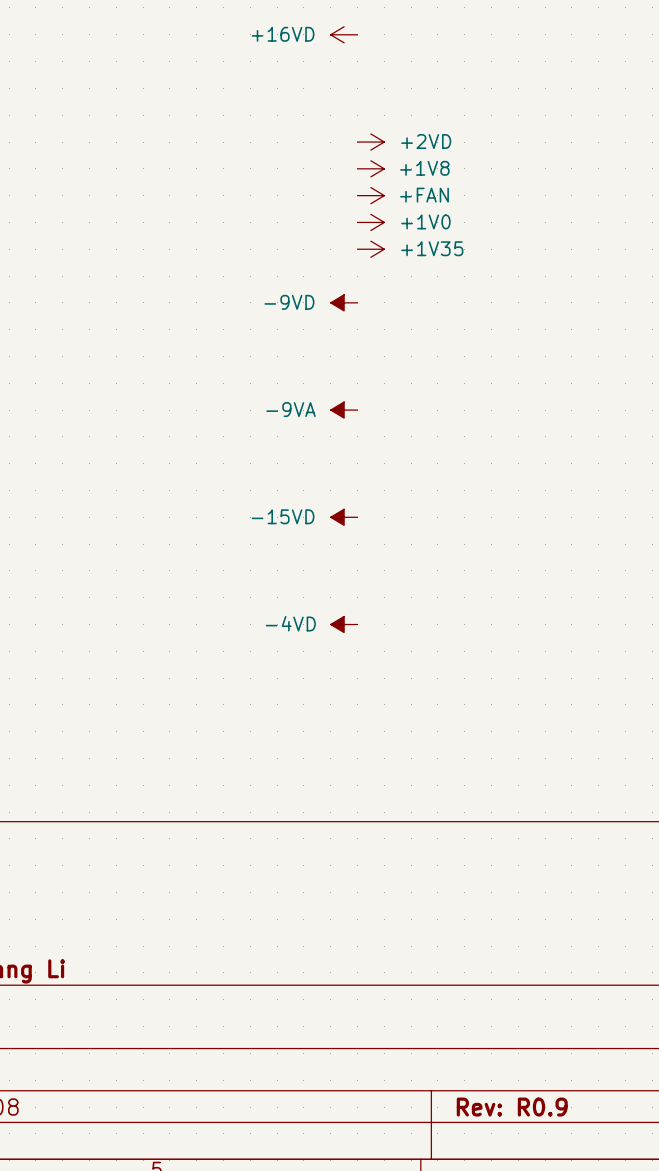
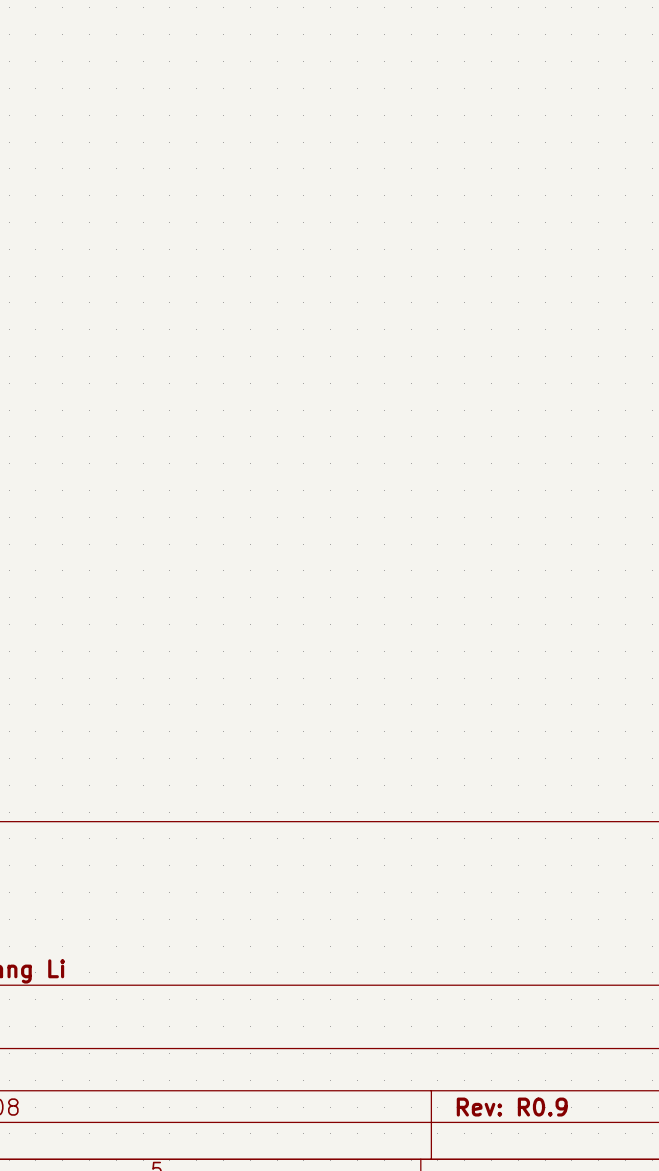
power symbol: +16VD (344, 34) -> none
power symbol: +2VD (370, 142) -> none
power symbol: +1V8 (370, 168) -> none
power symbol: +FAN (370, 195) -> none
power symbol: +1V0 (370, 222) -> none
power symbol: +1V35 (370, 249) -> none
power symbol: -9VD (344, 302) -> none
power symbol: -9VA (344, 410) -> none
power symbol: -15VD (344, 517) -> none
power symbol: -4VD (344, 624) -> none

